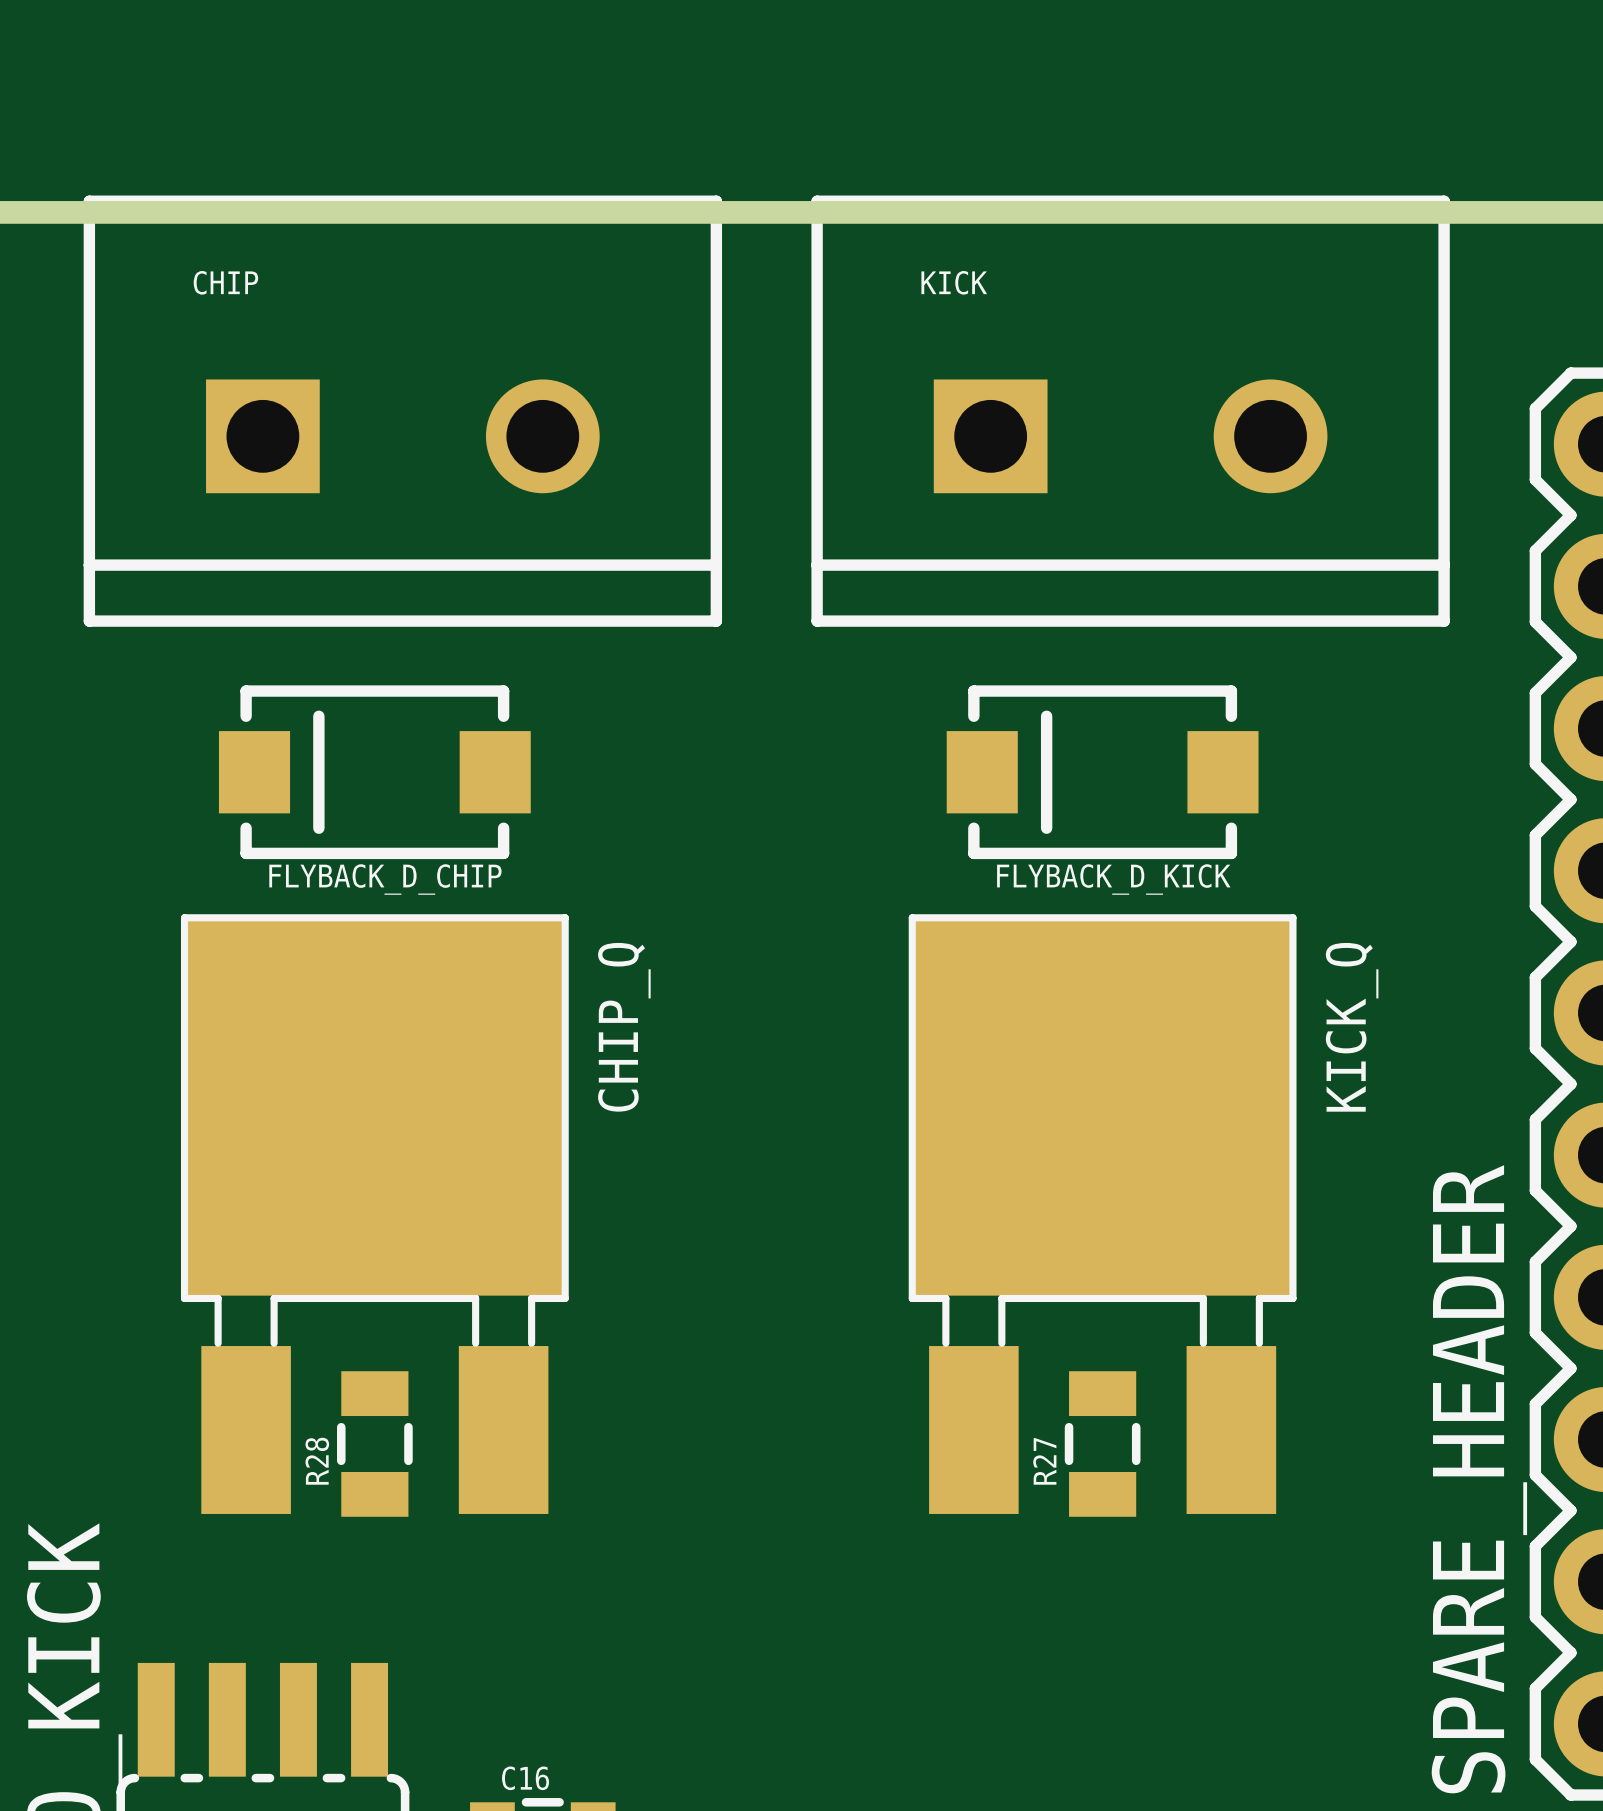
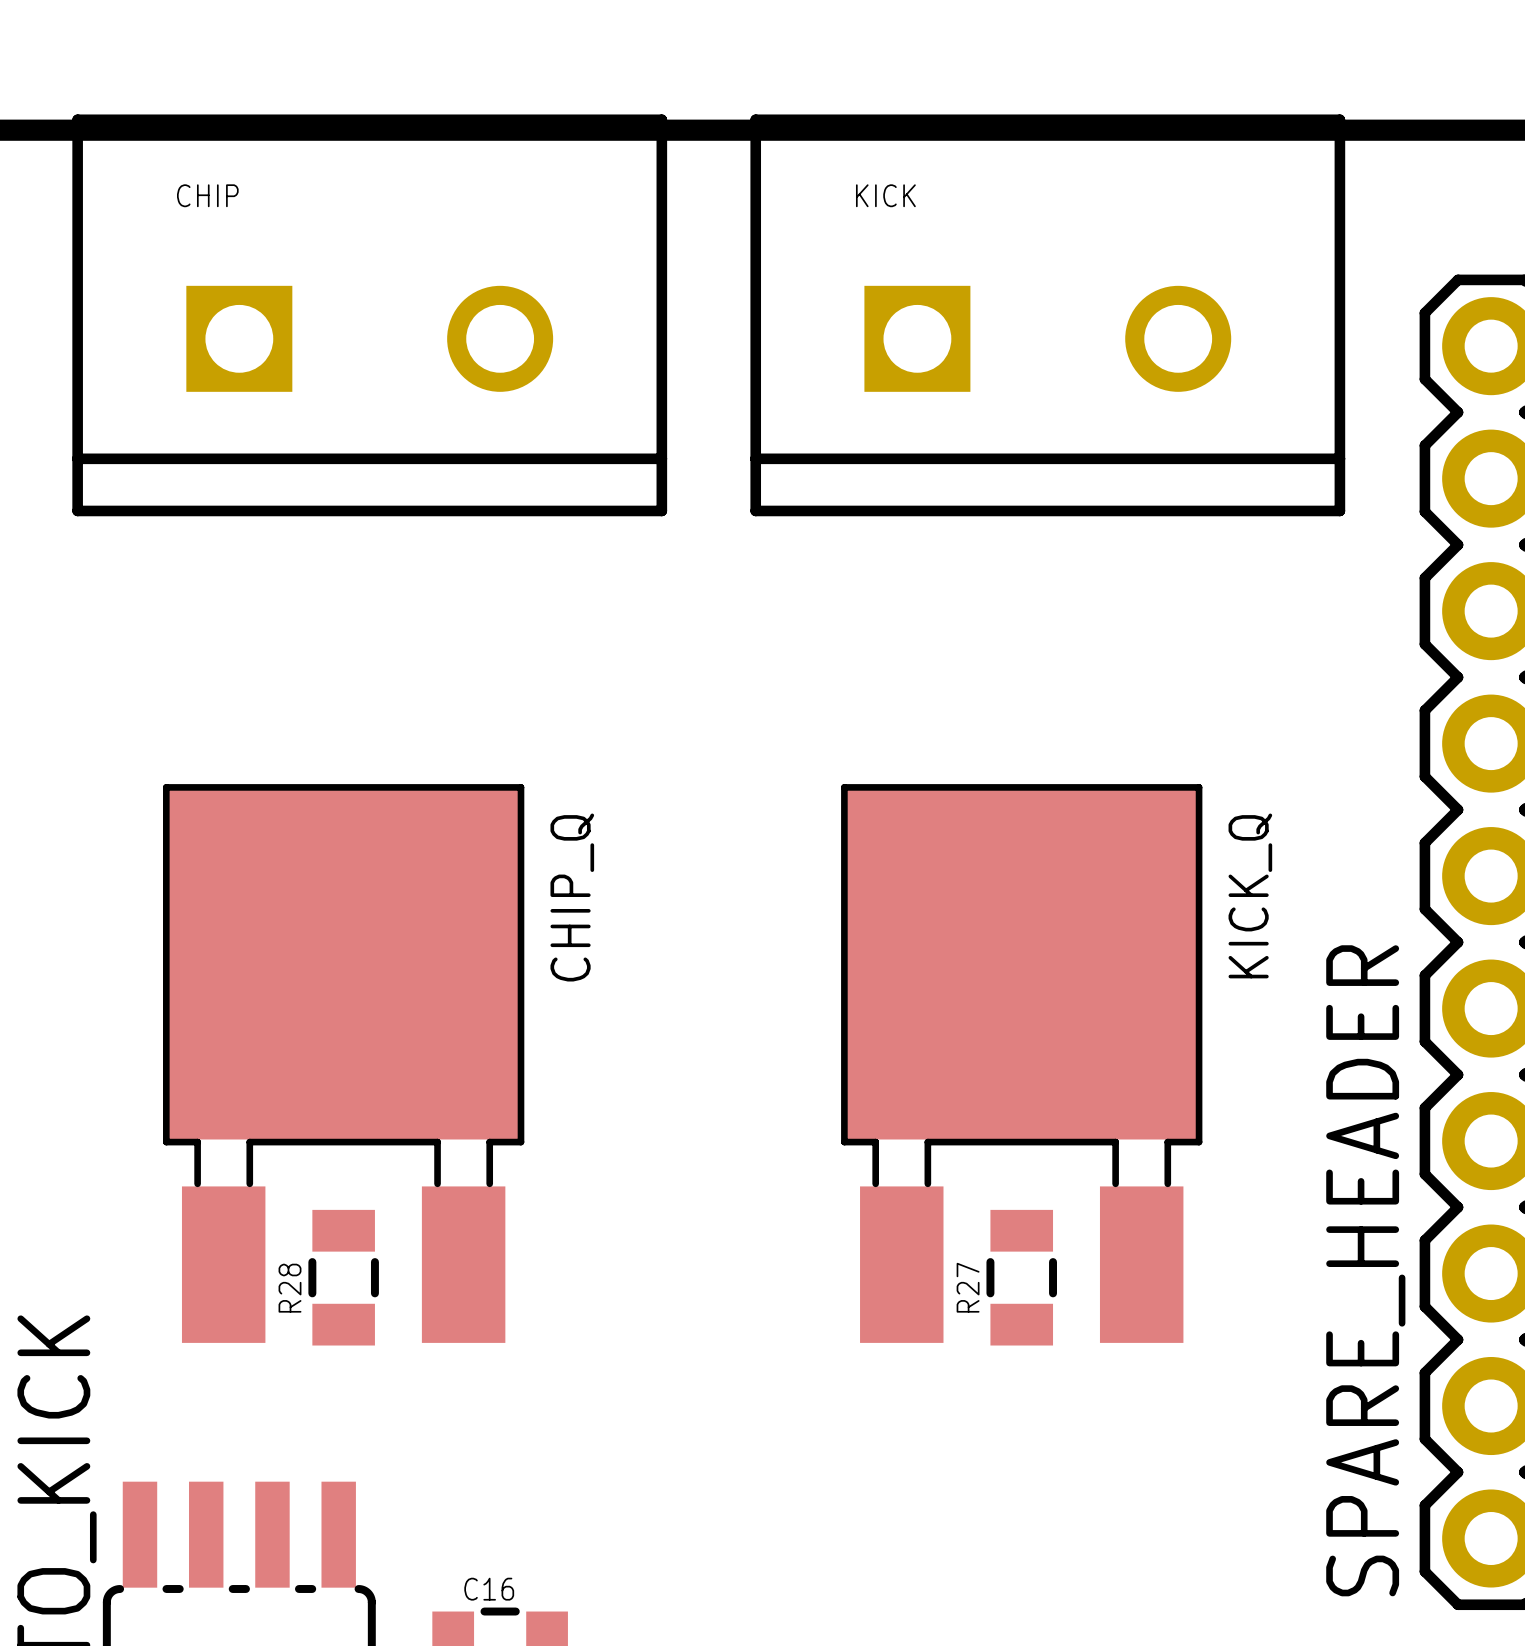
FLYBACK_D_CHIP: (374, 772) -> none
FLYBACK_D_KICK: (1102, 772) -> none

